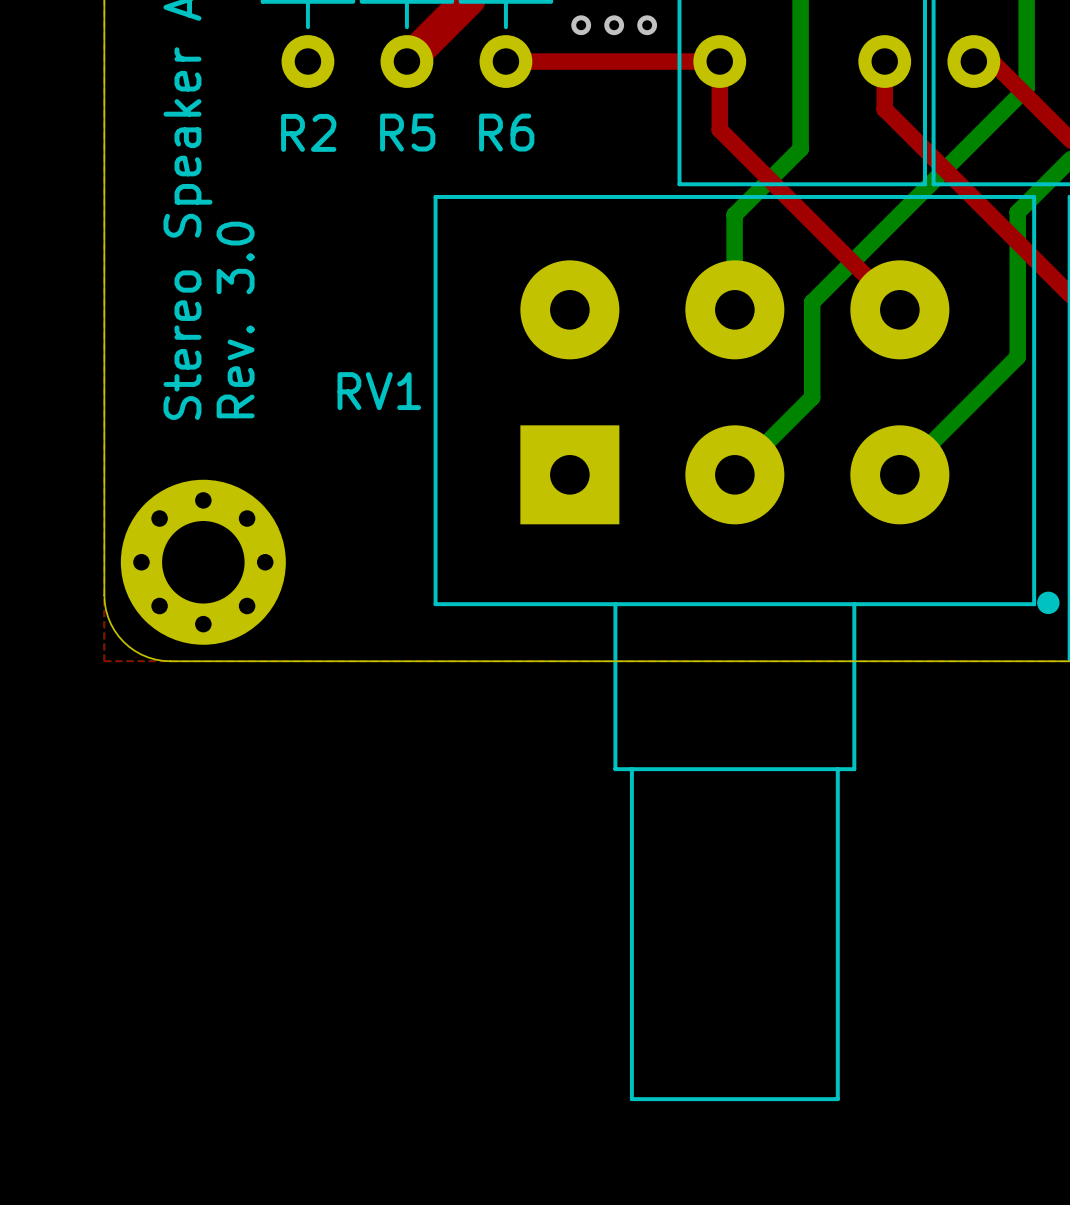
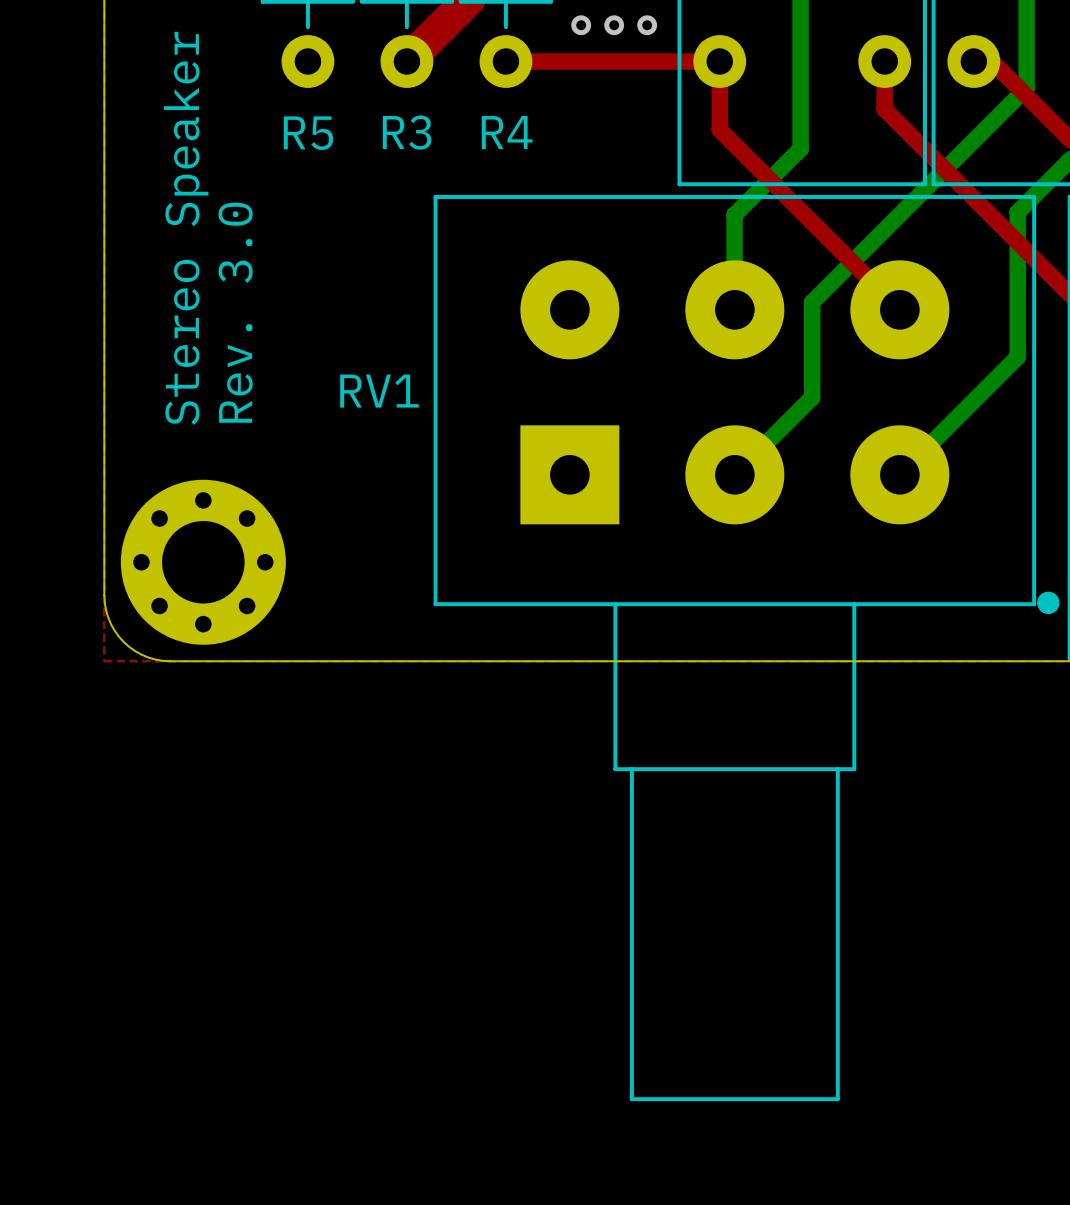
R2 name: R2 (308, 132) -> R5 (308, 133)
R5 name: R5 (407, 132) -> R3 (407, 132)
R6 name: R6 (506, 132) -> R4 (507, 132)

